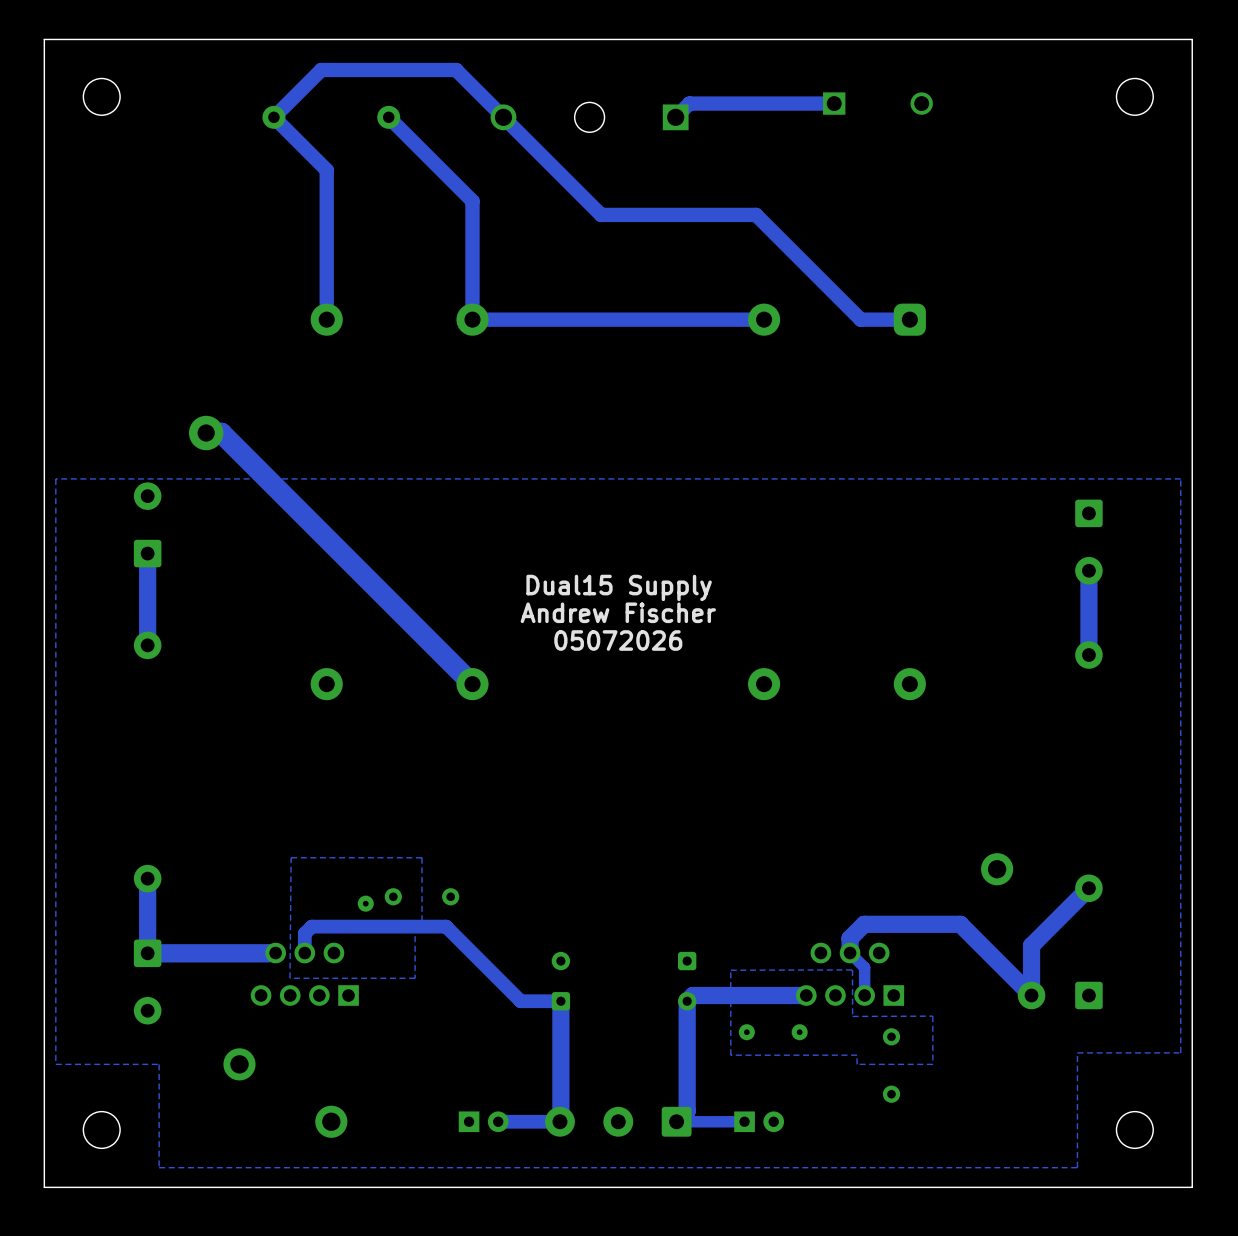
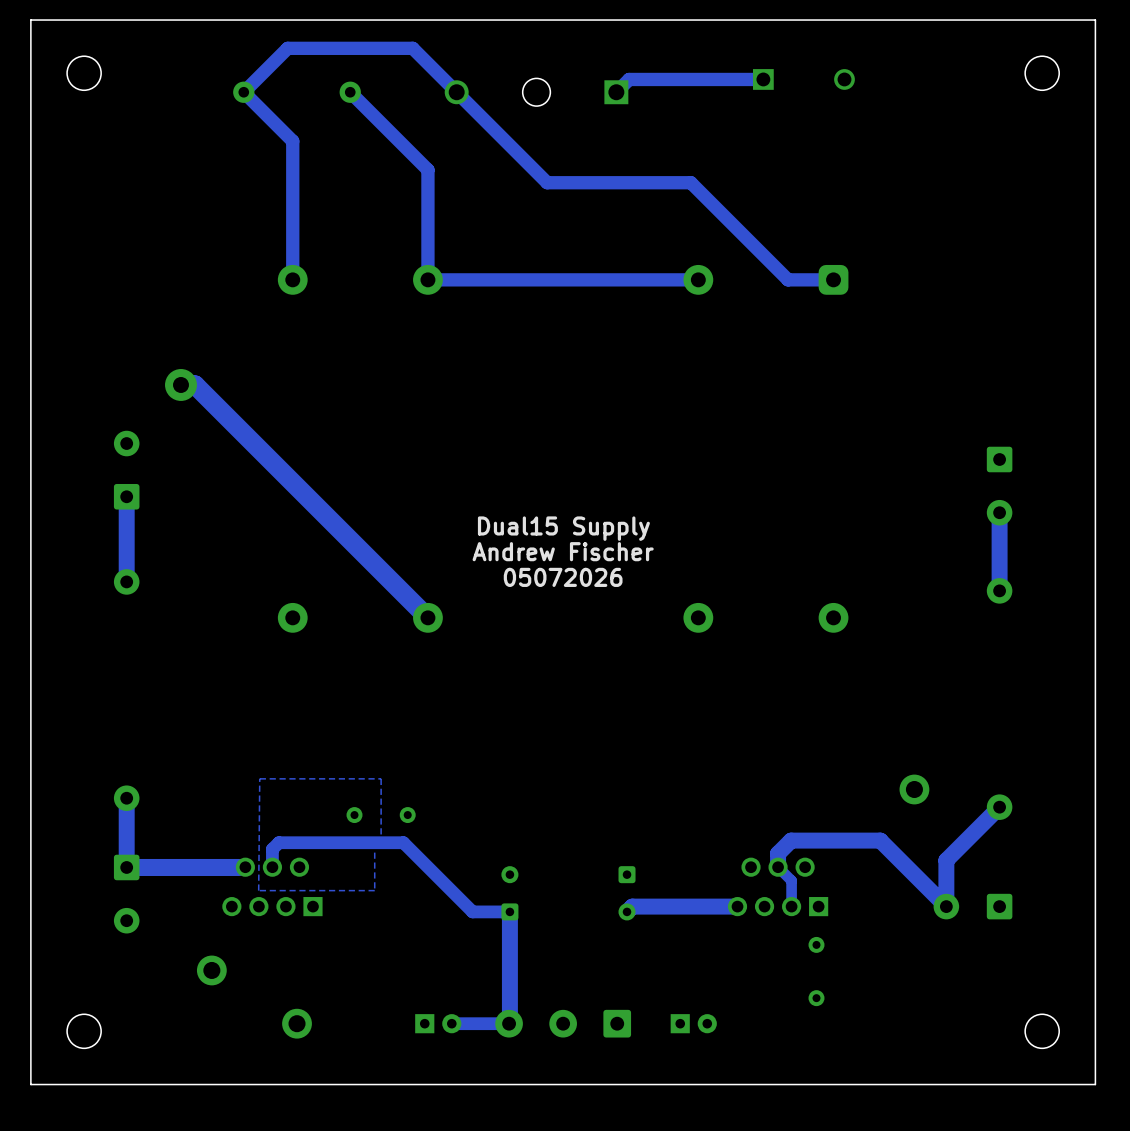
zone outline: (1180, 478) (55, 478) (55, 1064) (159, 1064) (159, 1167) (1077, 1167) (1077, 1052) (1180, 1052) (1180, 478) -> none
via: (365, 903) -> none
zone outline: (852, 969) (730, 970) (730, 1055) (857, 1055) (857, 1064) (932, 1064) (932, 1016) (852, 1016) (852, 969) -> none
track: (687, 1001) (687, 1111) (676, 1121) (744, 1121) -> none
via: (746, 1032) -> none
via: (799, 1032) -> none

